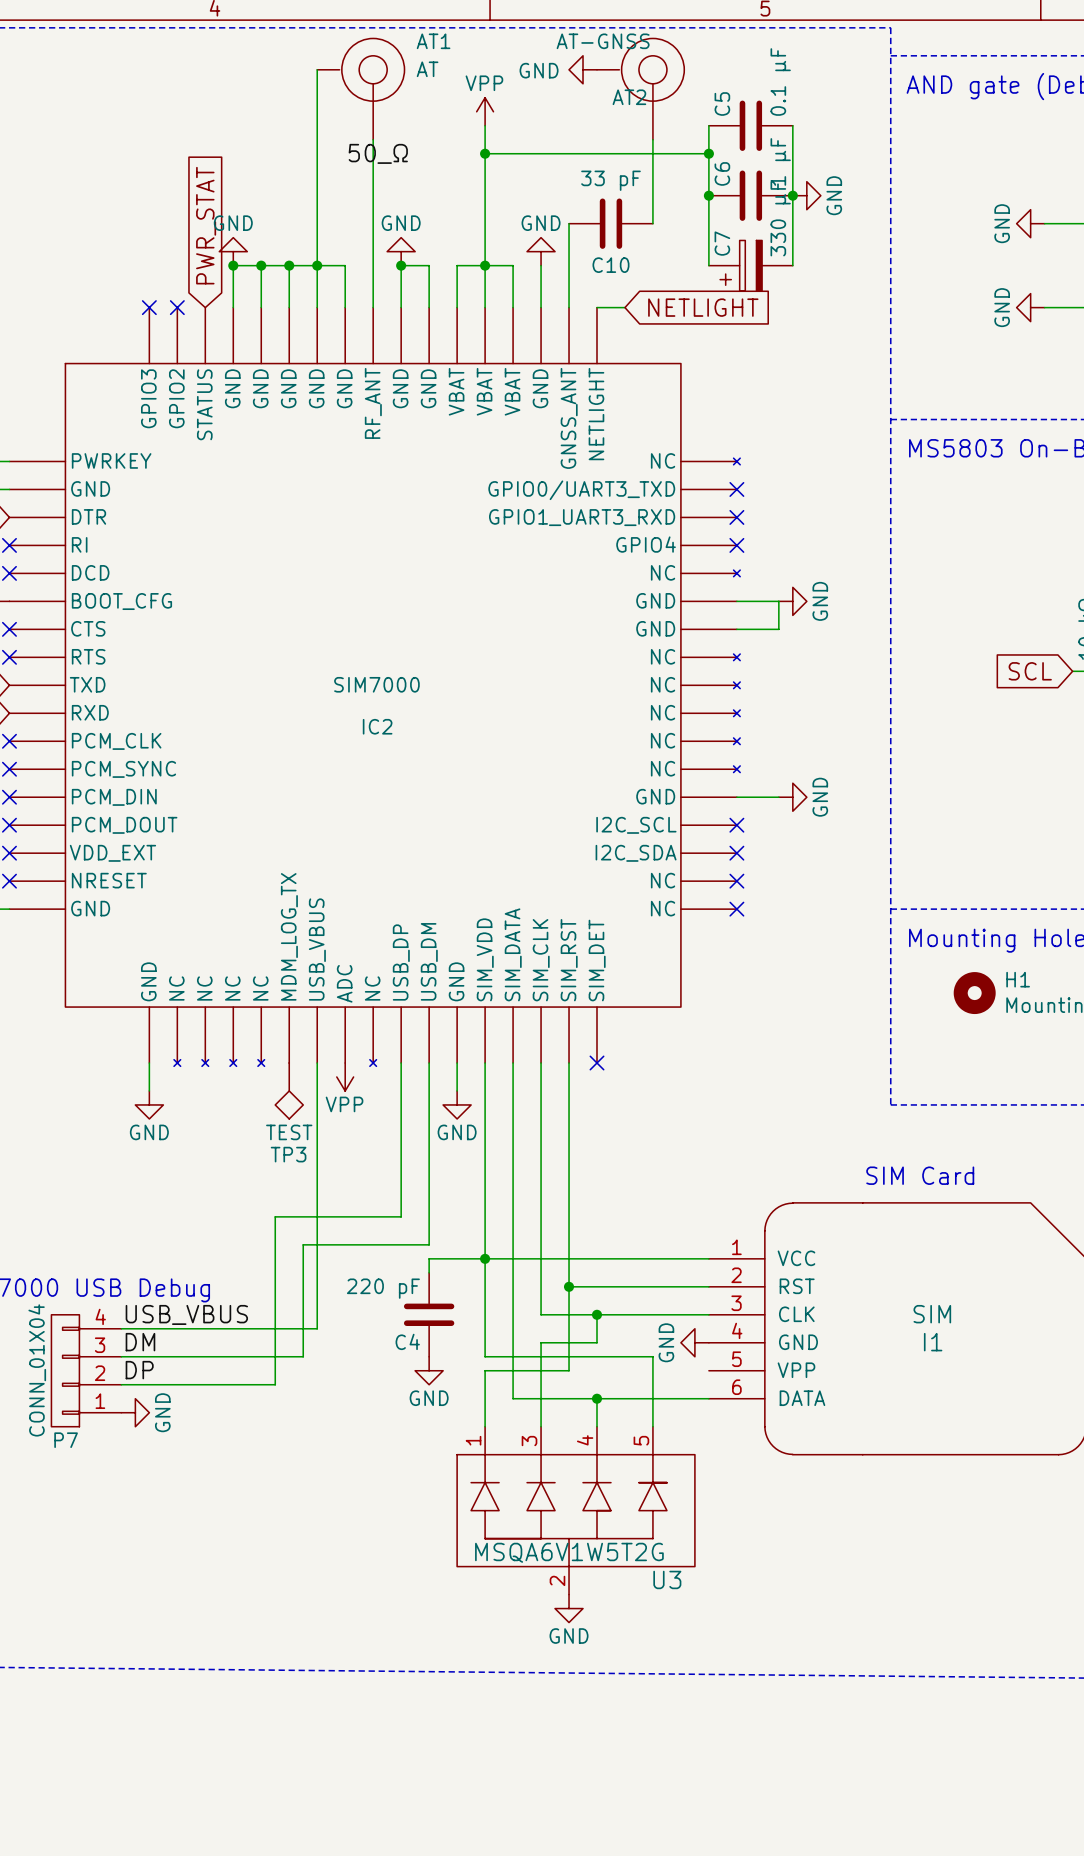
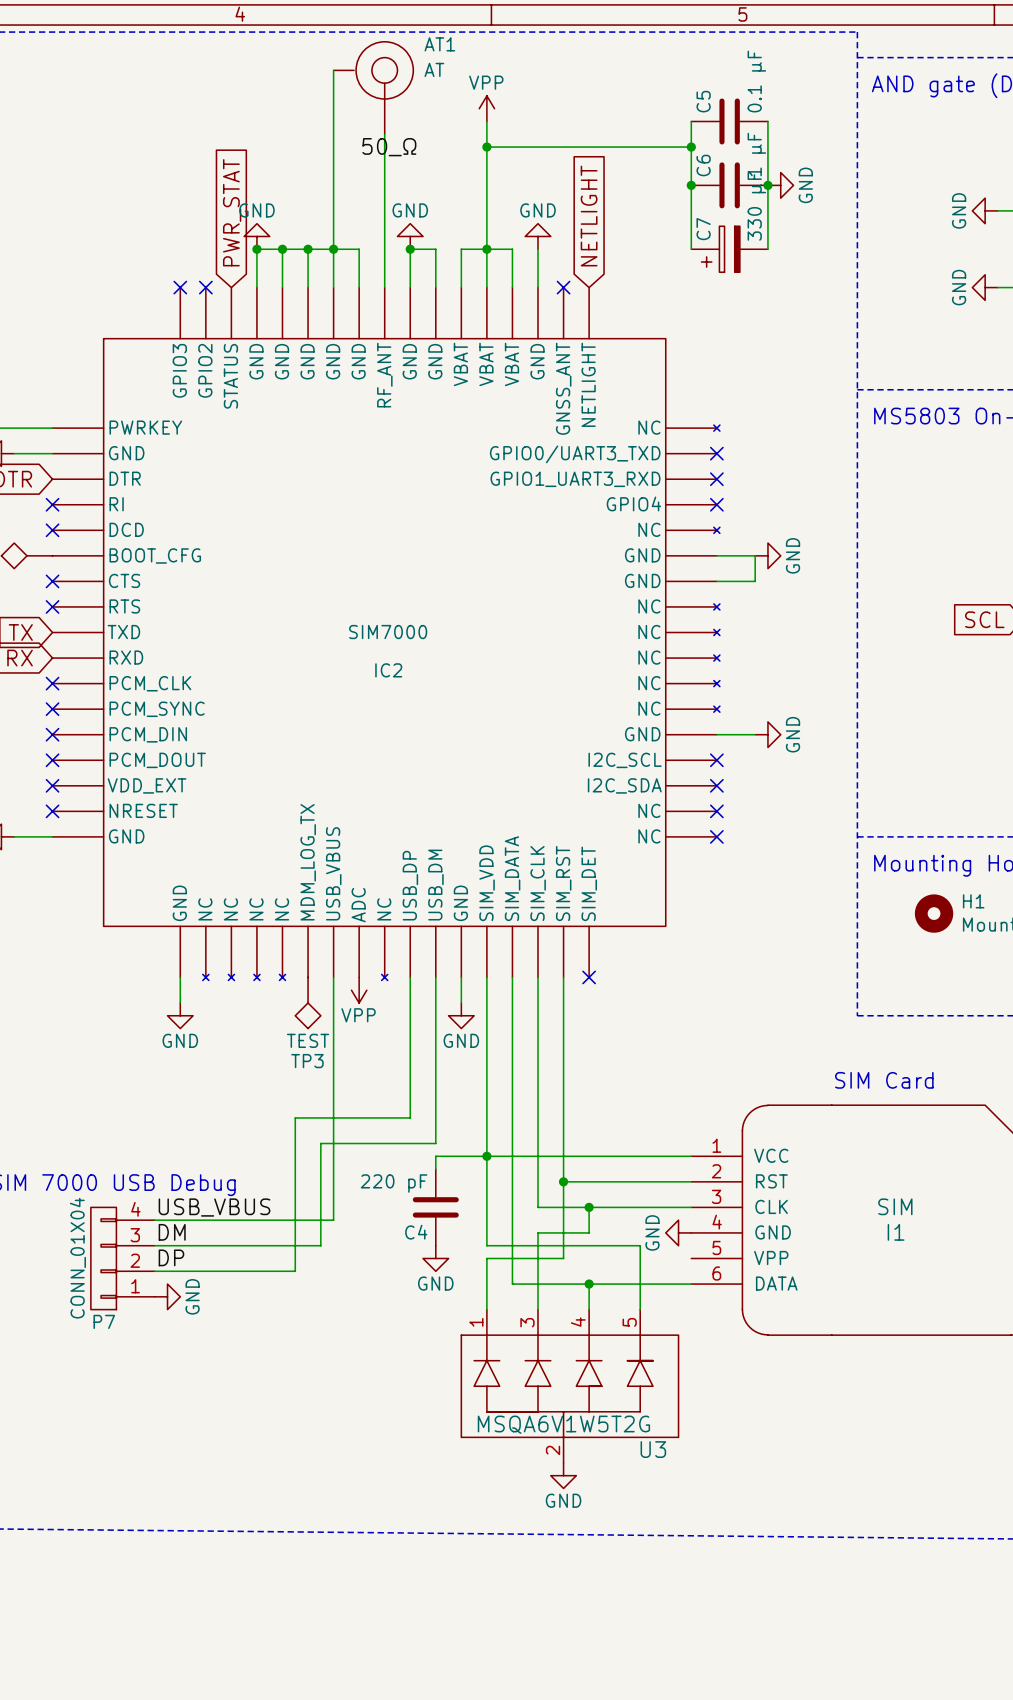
power symbol: GND (583, 69) -> none
AT2: AT-GNSS (640, 89) -> none
wire: (652, 139) (652, 223) -> none
wire: (569, 223) (569, 307) -> none
C10: 33 pF (610, 223) -> none
no-connect mark: none -> (563, 287)
wire: (596, 307) (624, 307) -> none
global label rotation: 0° (703, 307) -> 90° counterclockwise (589, 216)

